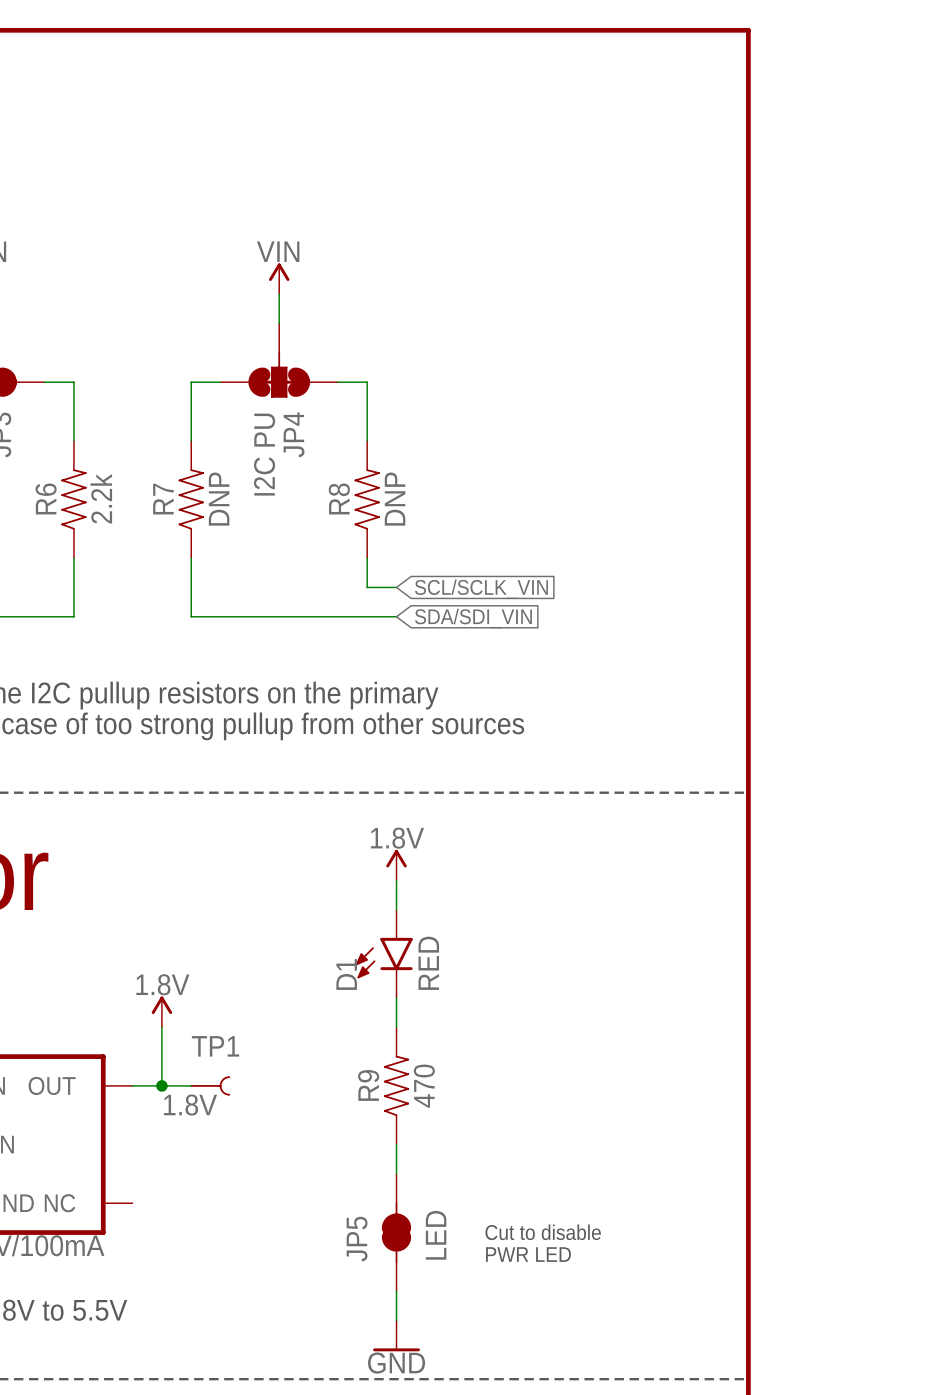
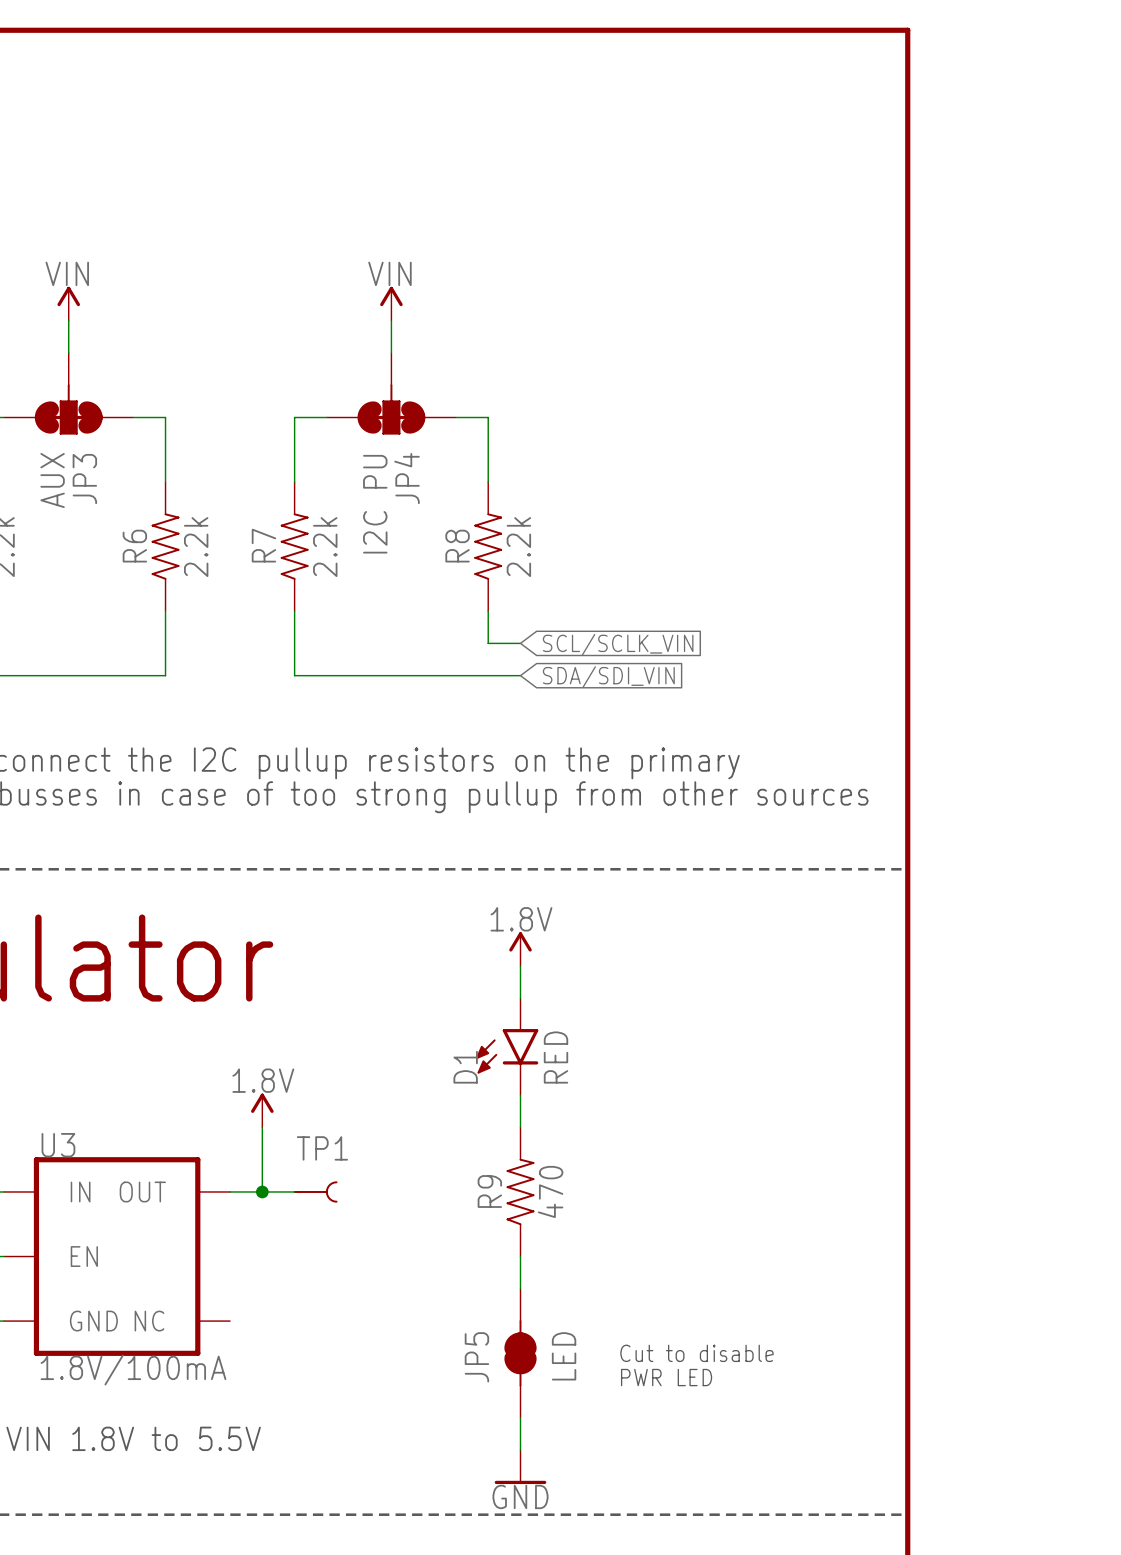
R7 value: DNP (219, 499) -> 2.2k (325, 547)
R8 value: DNP (395, 499) -> 2.2k (518, 547)
TP1 value: 1.8V (190, 1104) -> none

